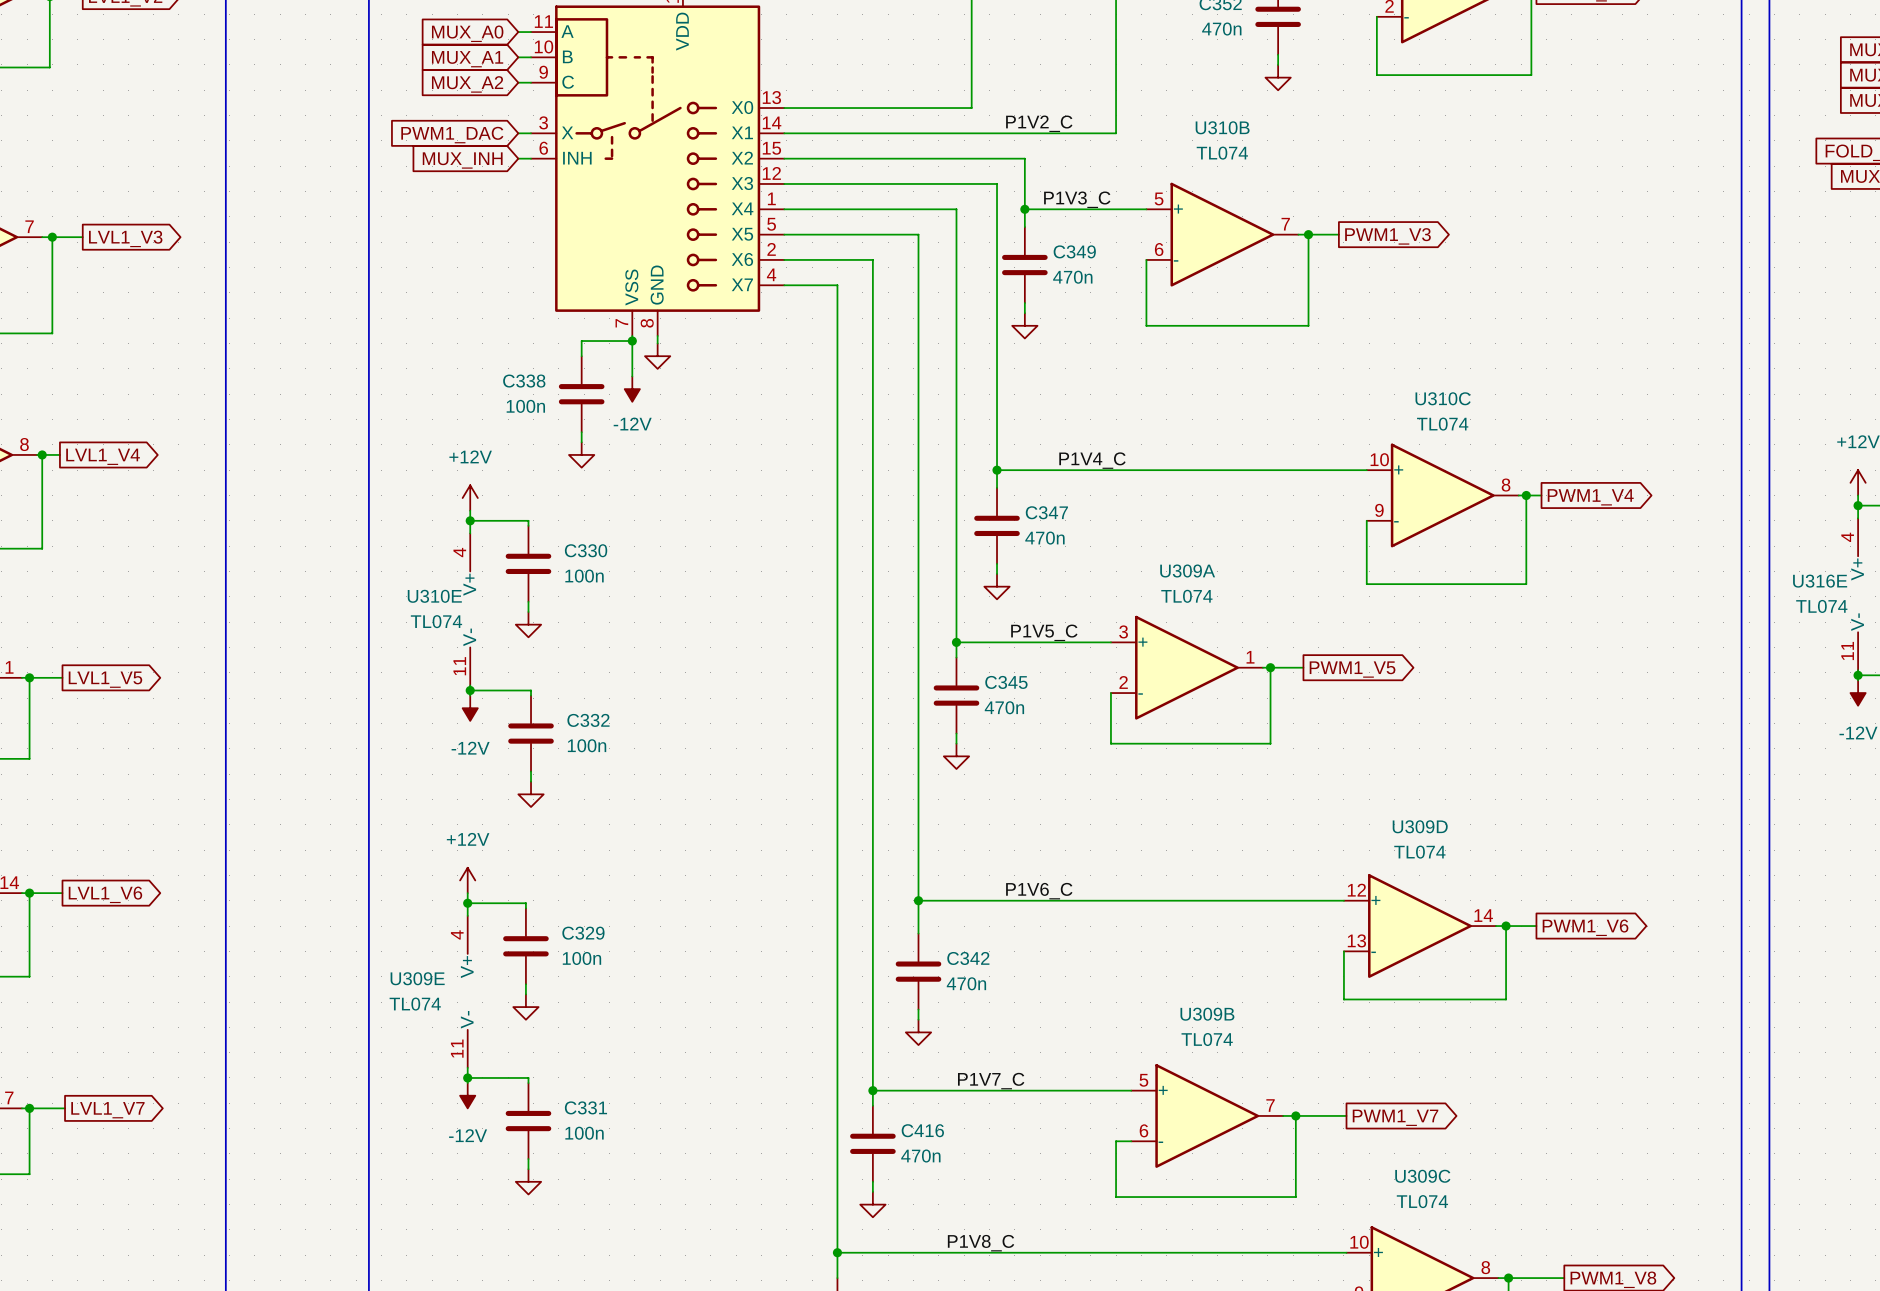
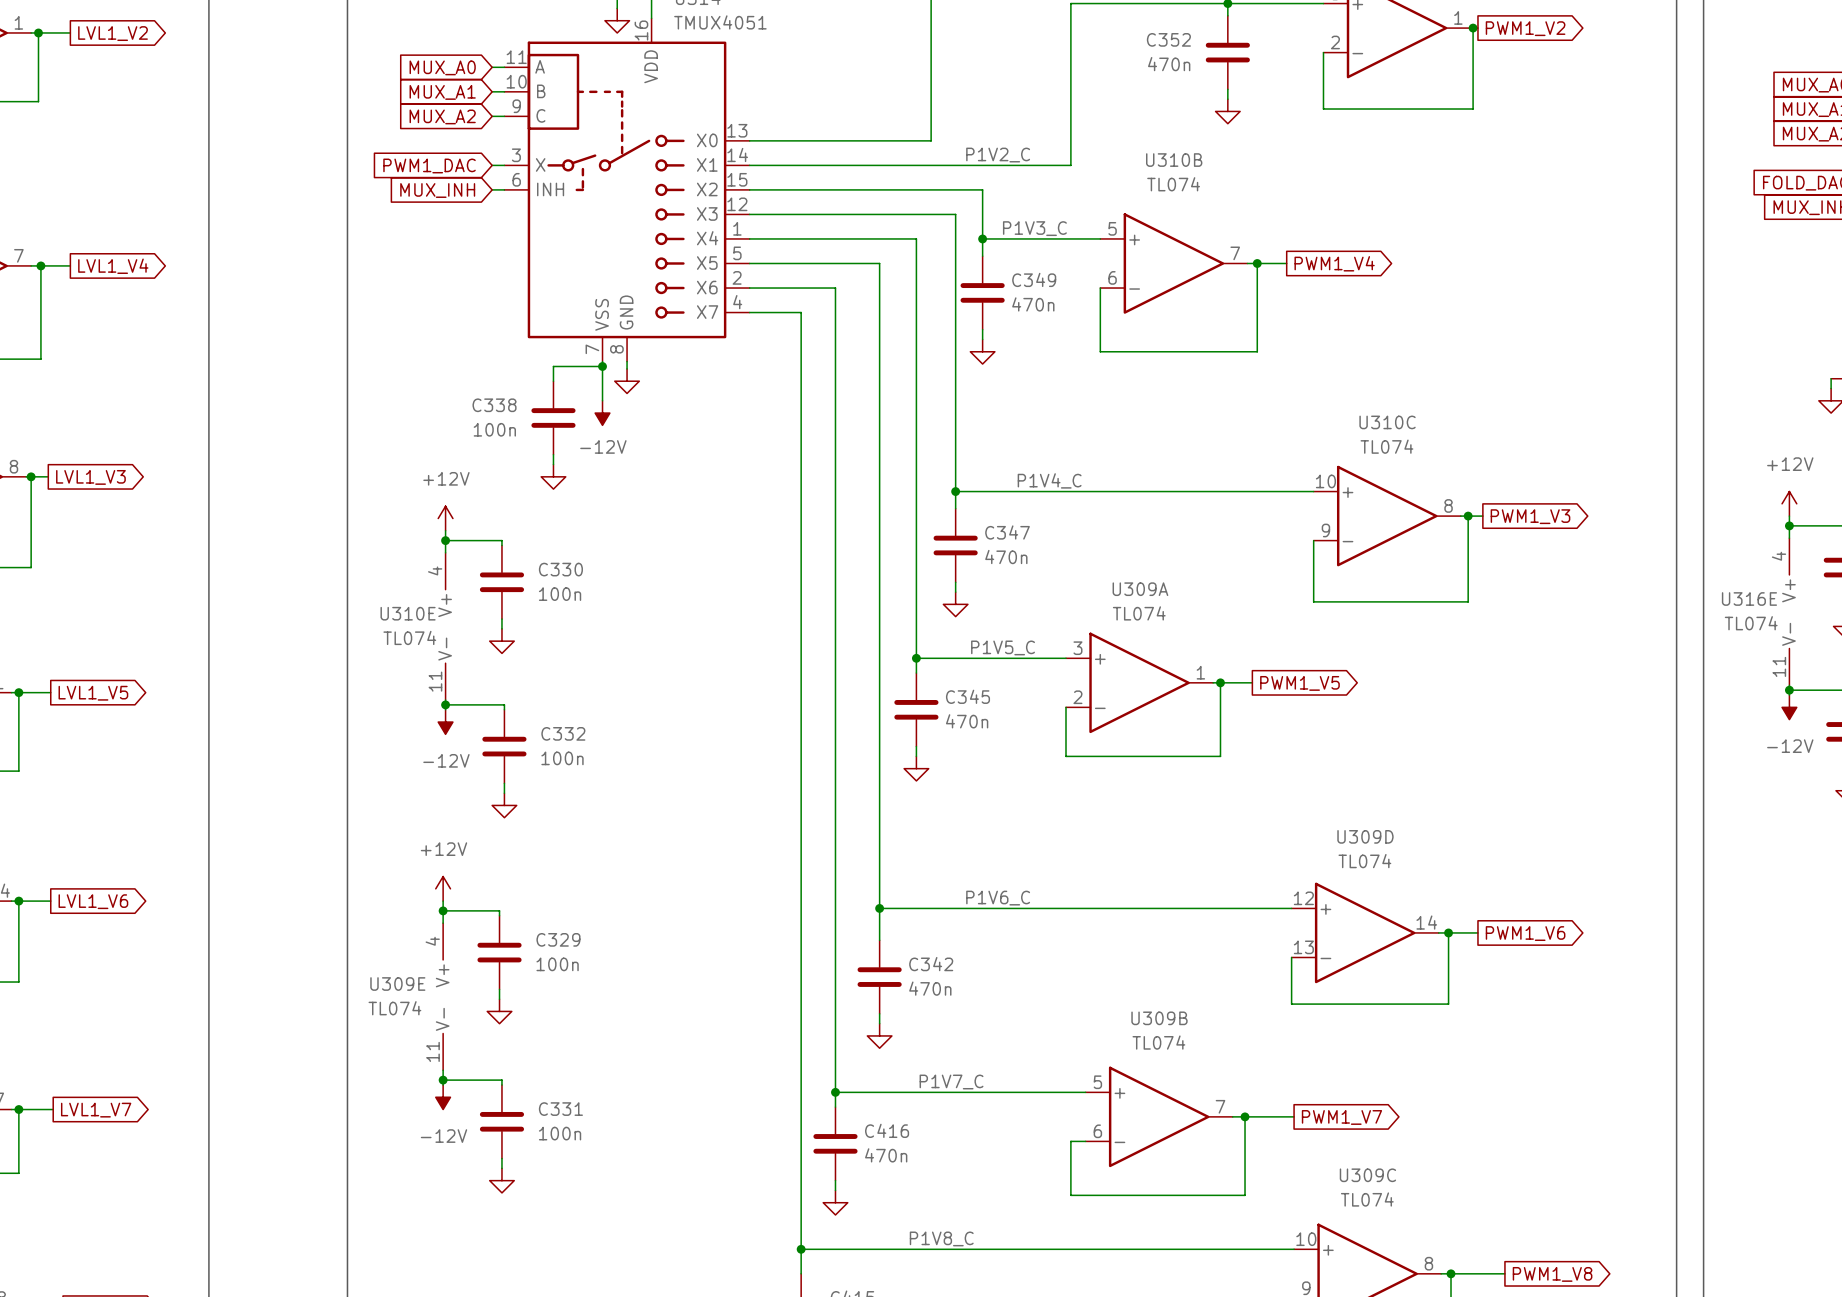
global label: PWM1_V3 (1387, 236) -> PWM1_V4 (1334, 263)
global label: LVL1_V3 (125, 238) -> LVL1_V4 (113, 266)
global label: LVL1_V4 (103, 456) -> LVL1_V3 (90, 477)
global label: PWM1_V4 (1590, 497) -> PWM1_V3 (1530, 516)

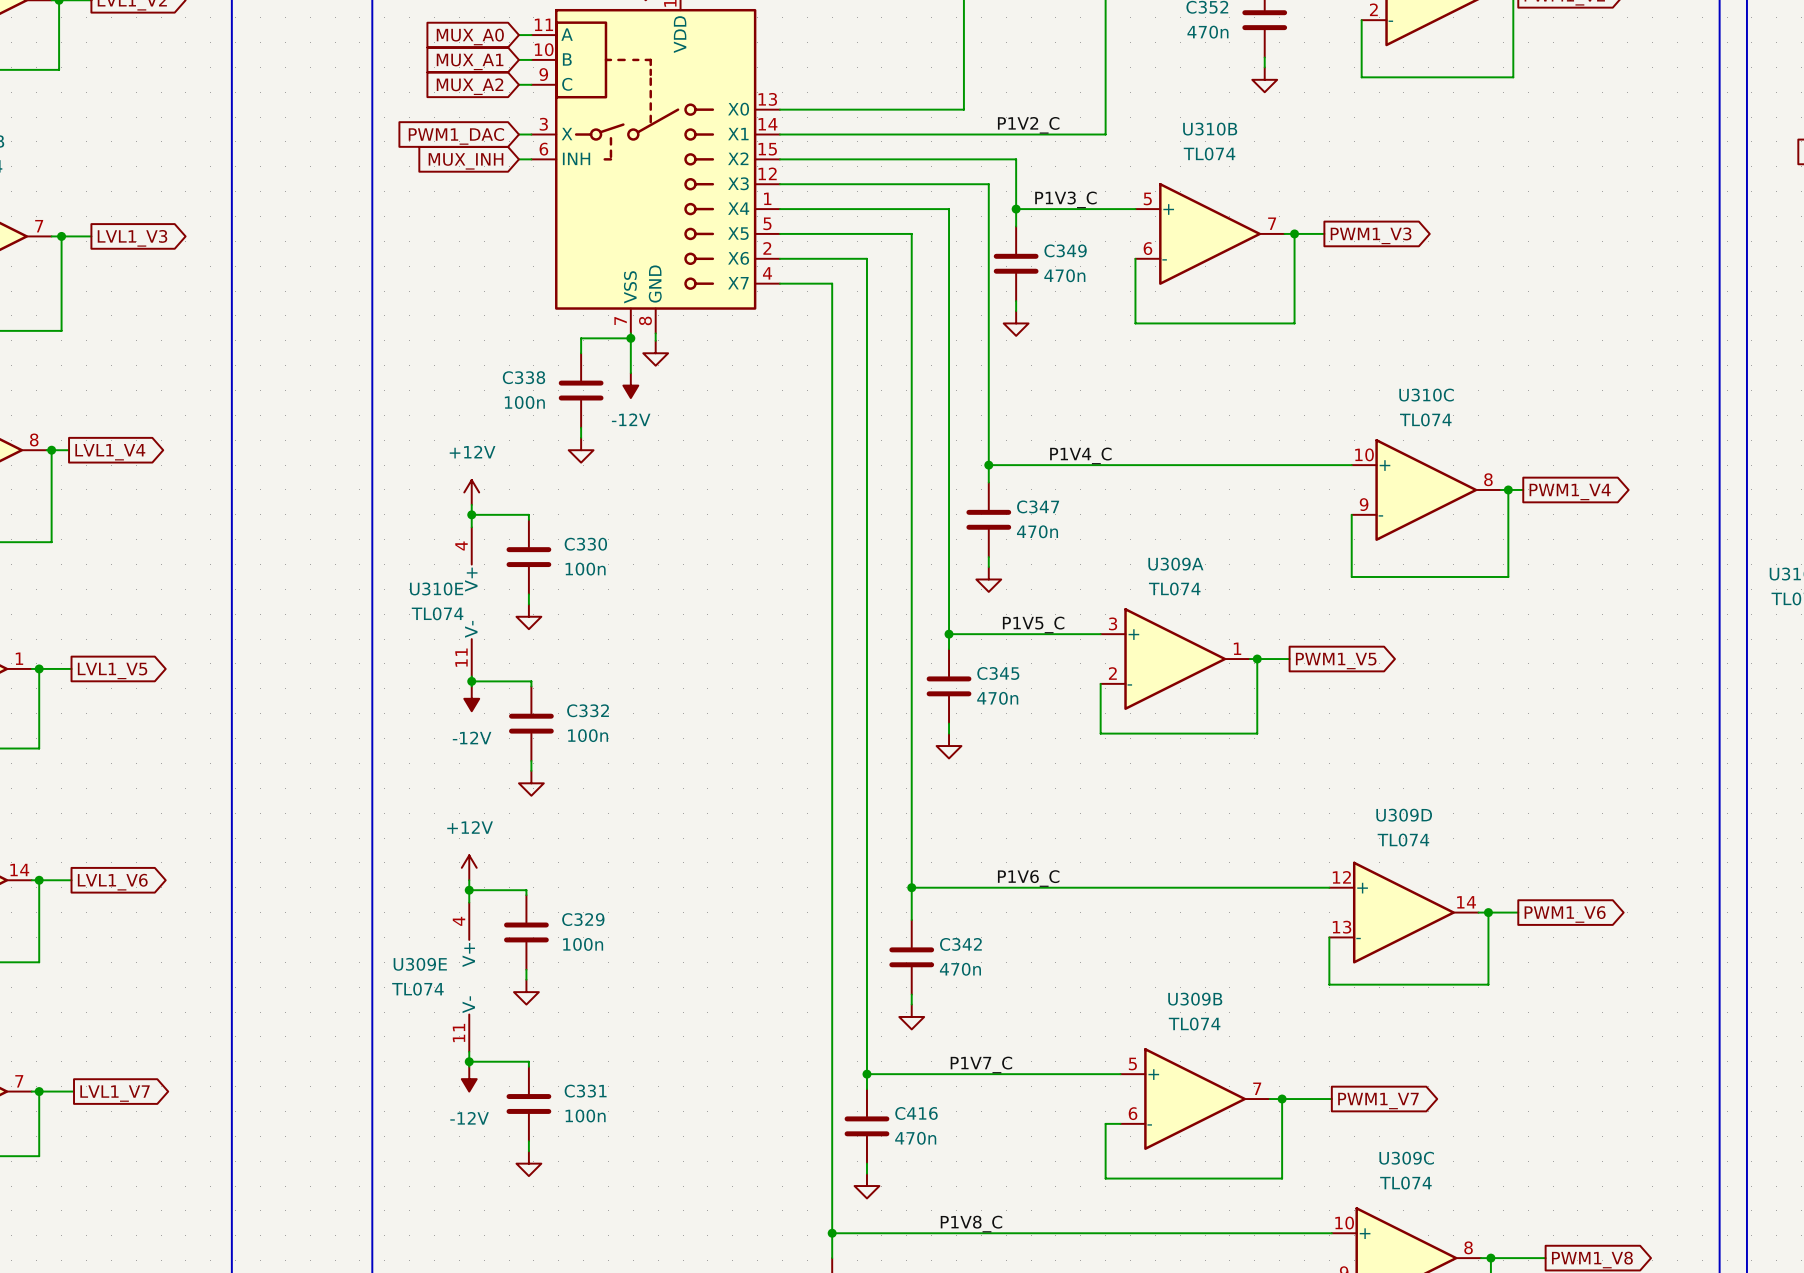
global label: PWM1_V4 (1334, 263) -> PWM1_V3 (1371, 235)
global label: LVL1_V4 (113, 266) -> LVL1_V3 (132, 238)
global label: LVL1_V3 (90, 477) -> LVL1_V4 (110, 452)
global label: PWM1_V3 (1530, 516) -> PWM1_V4 (1570, 491)

